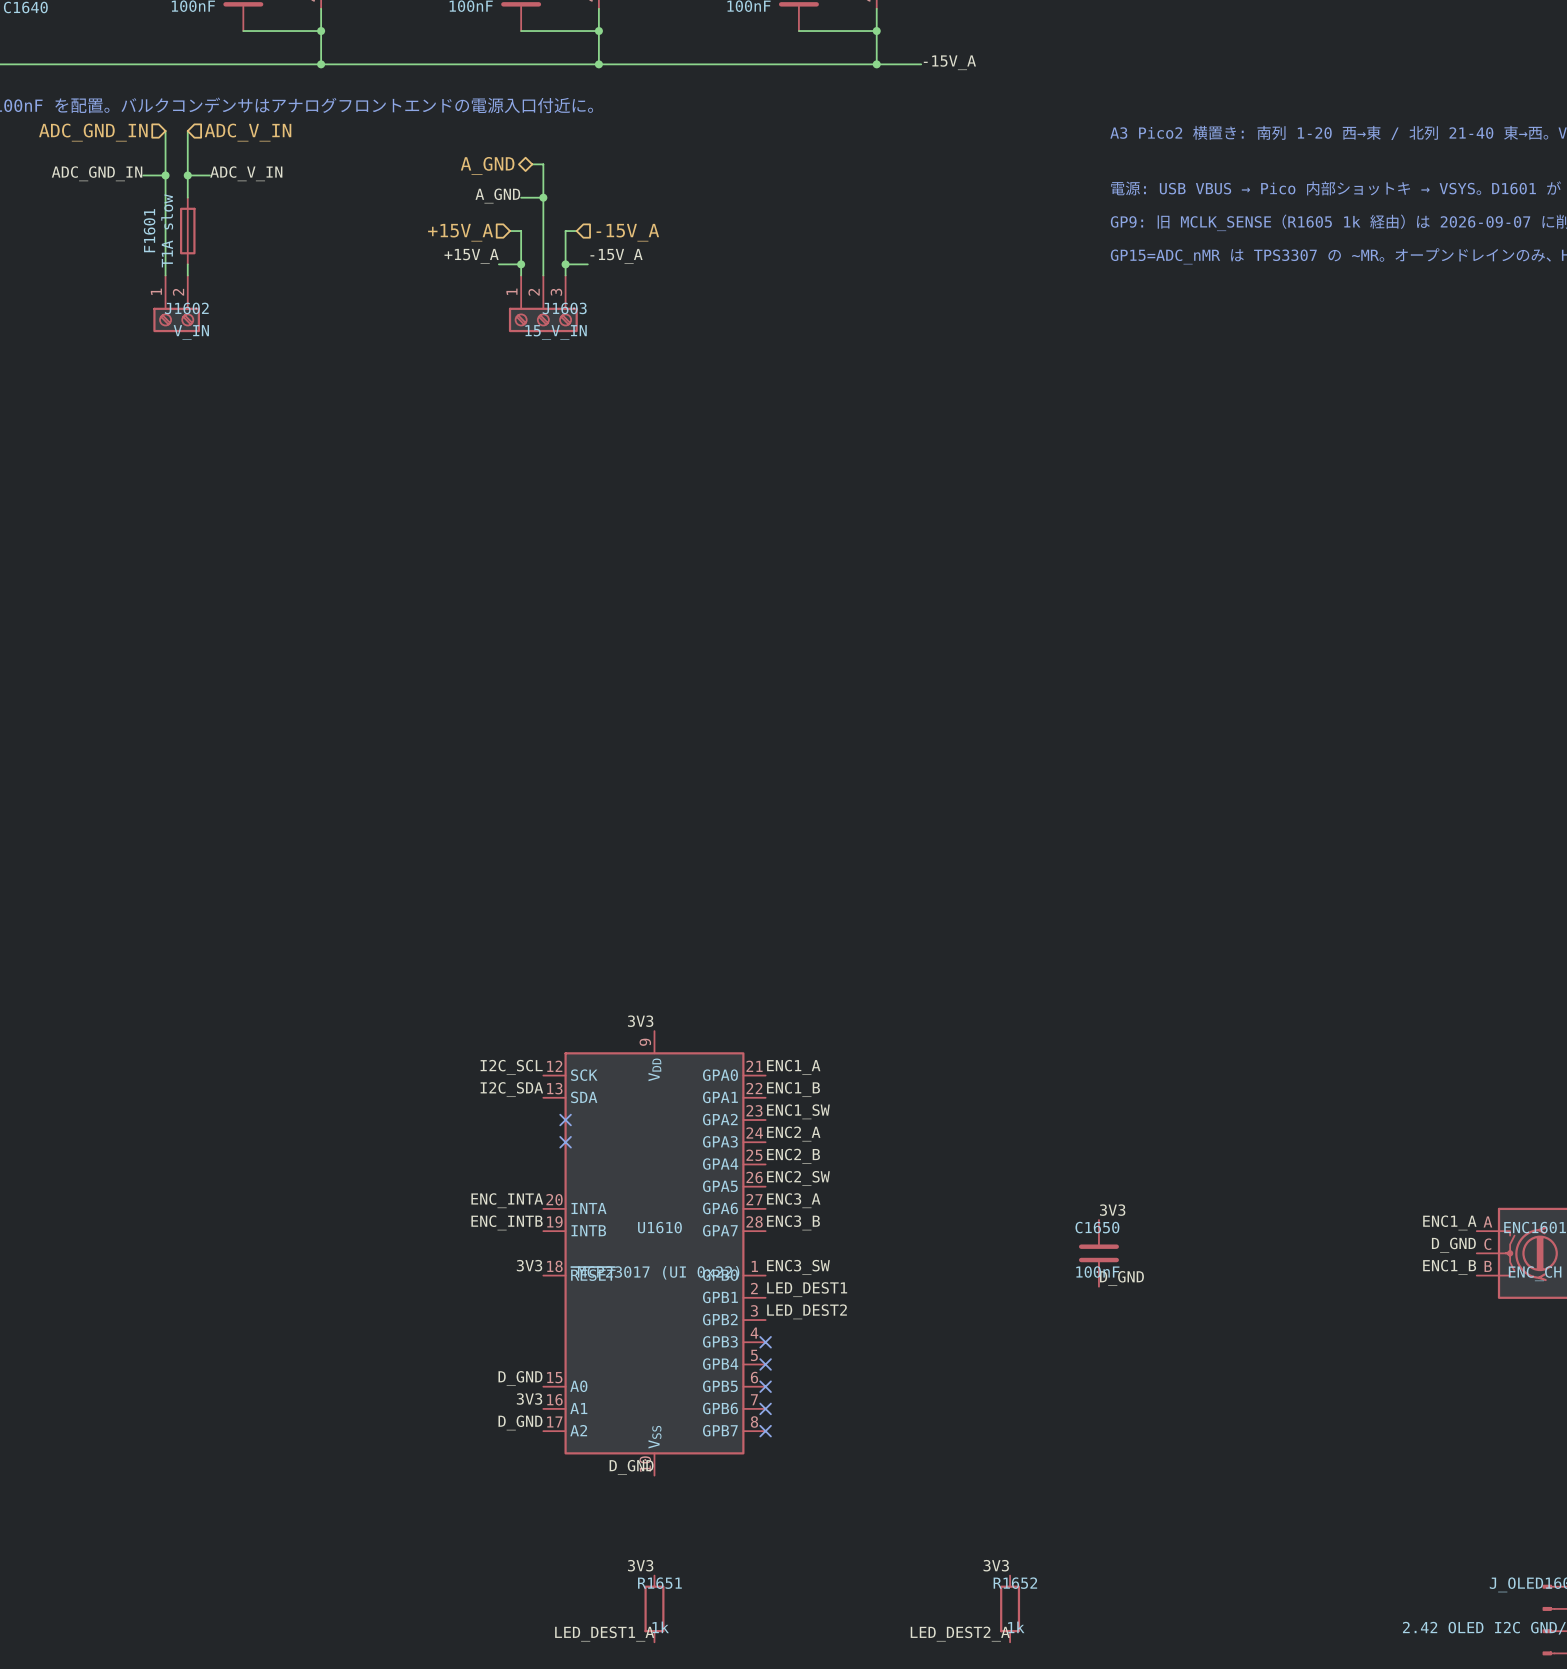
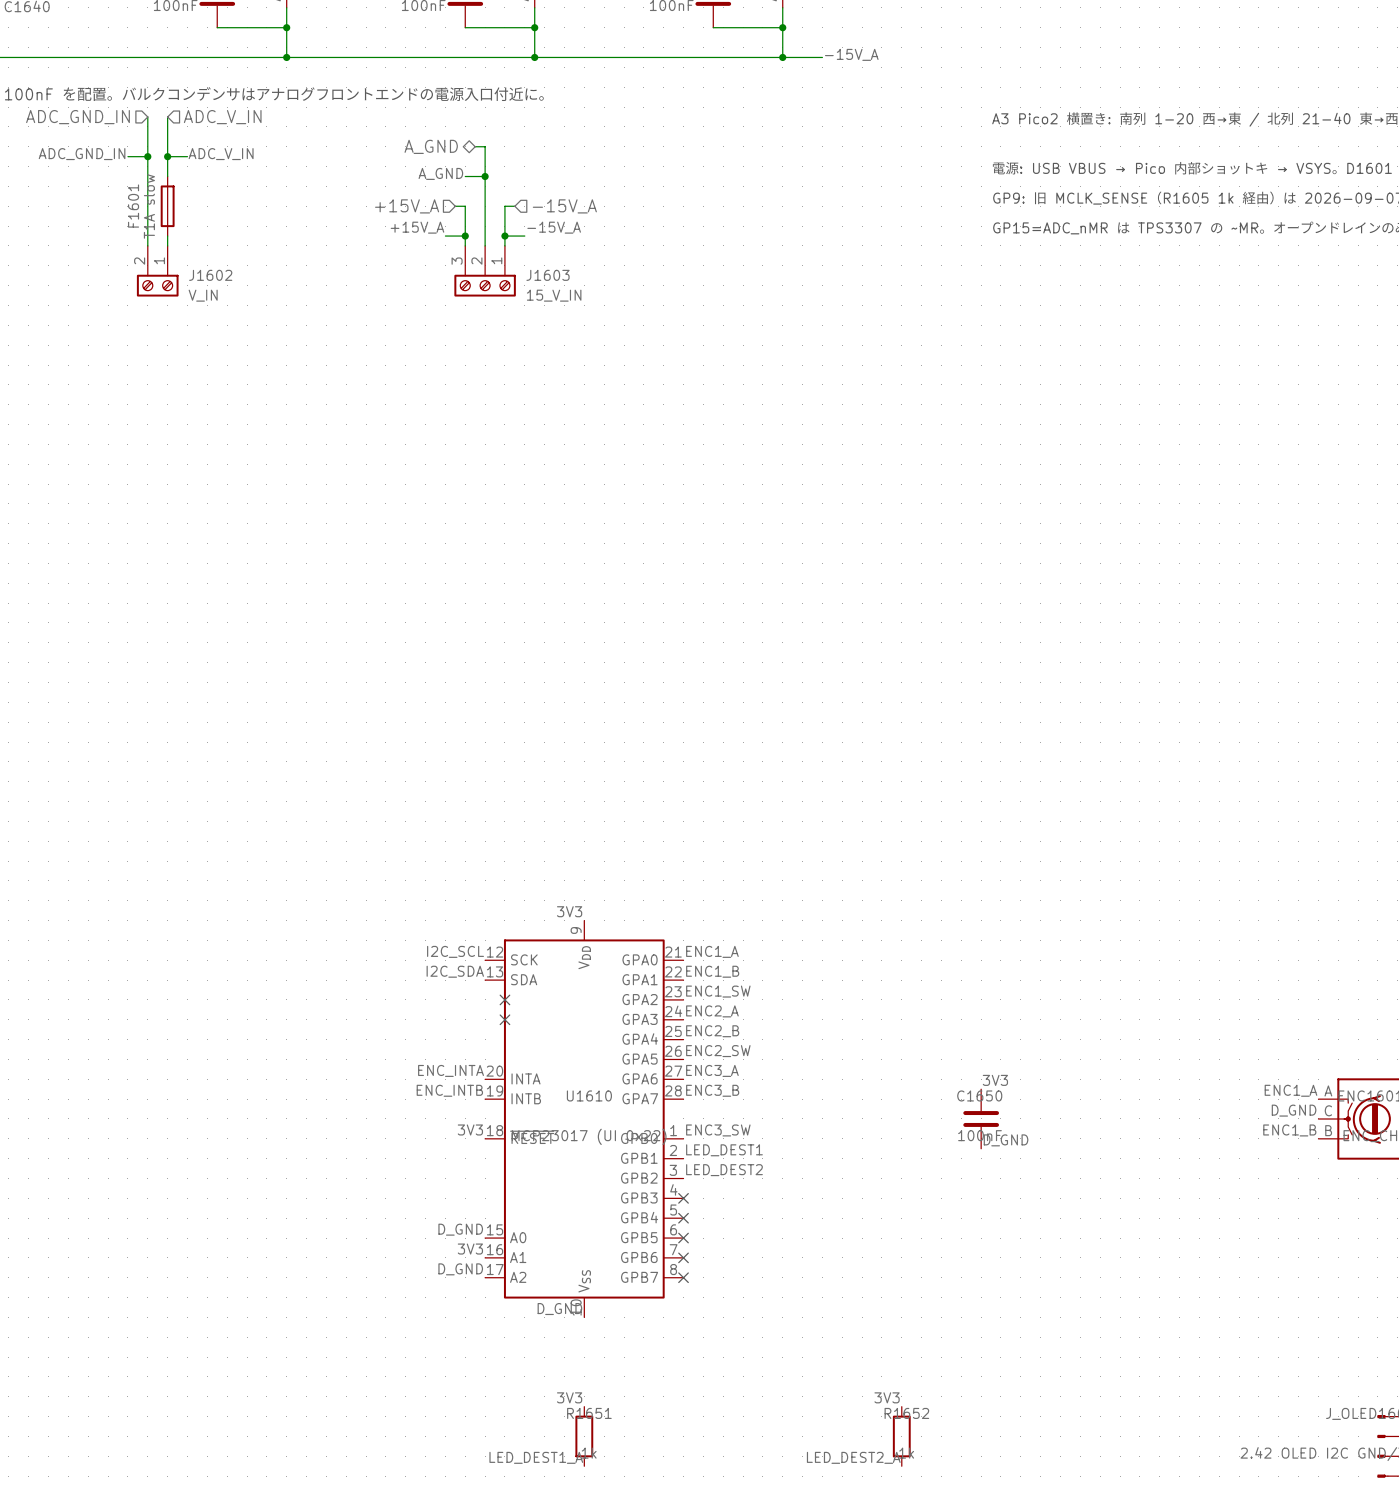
J1602 name position: J1602 (186, 308) -> J1602 (210, 275)
J1603 name position: J1603 (564, 308) -> J1603 (548, 275)
J1602 flip: as is (176, 319) -> left-right (157, 285)
J1603 flip: as is (543, 319) -> left-right (485, 285)
J1602 value position: V_IN (191, 332) -> V_IN (203, 295)
J1603 value position: 15_V_IN (556, 332) -> 15_V_IN (554, 295)

